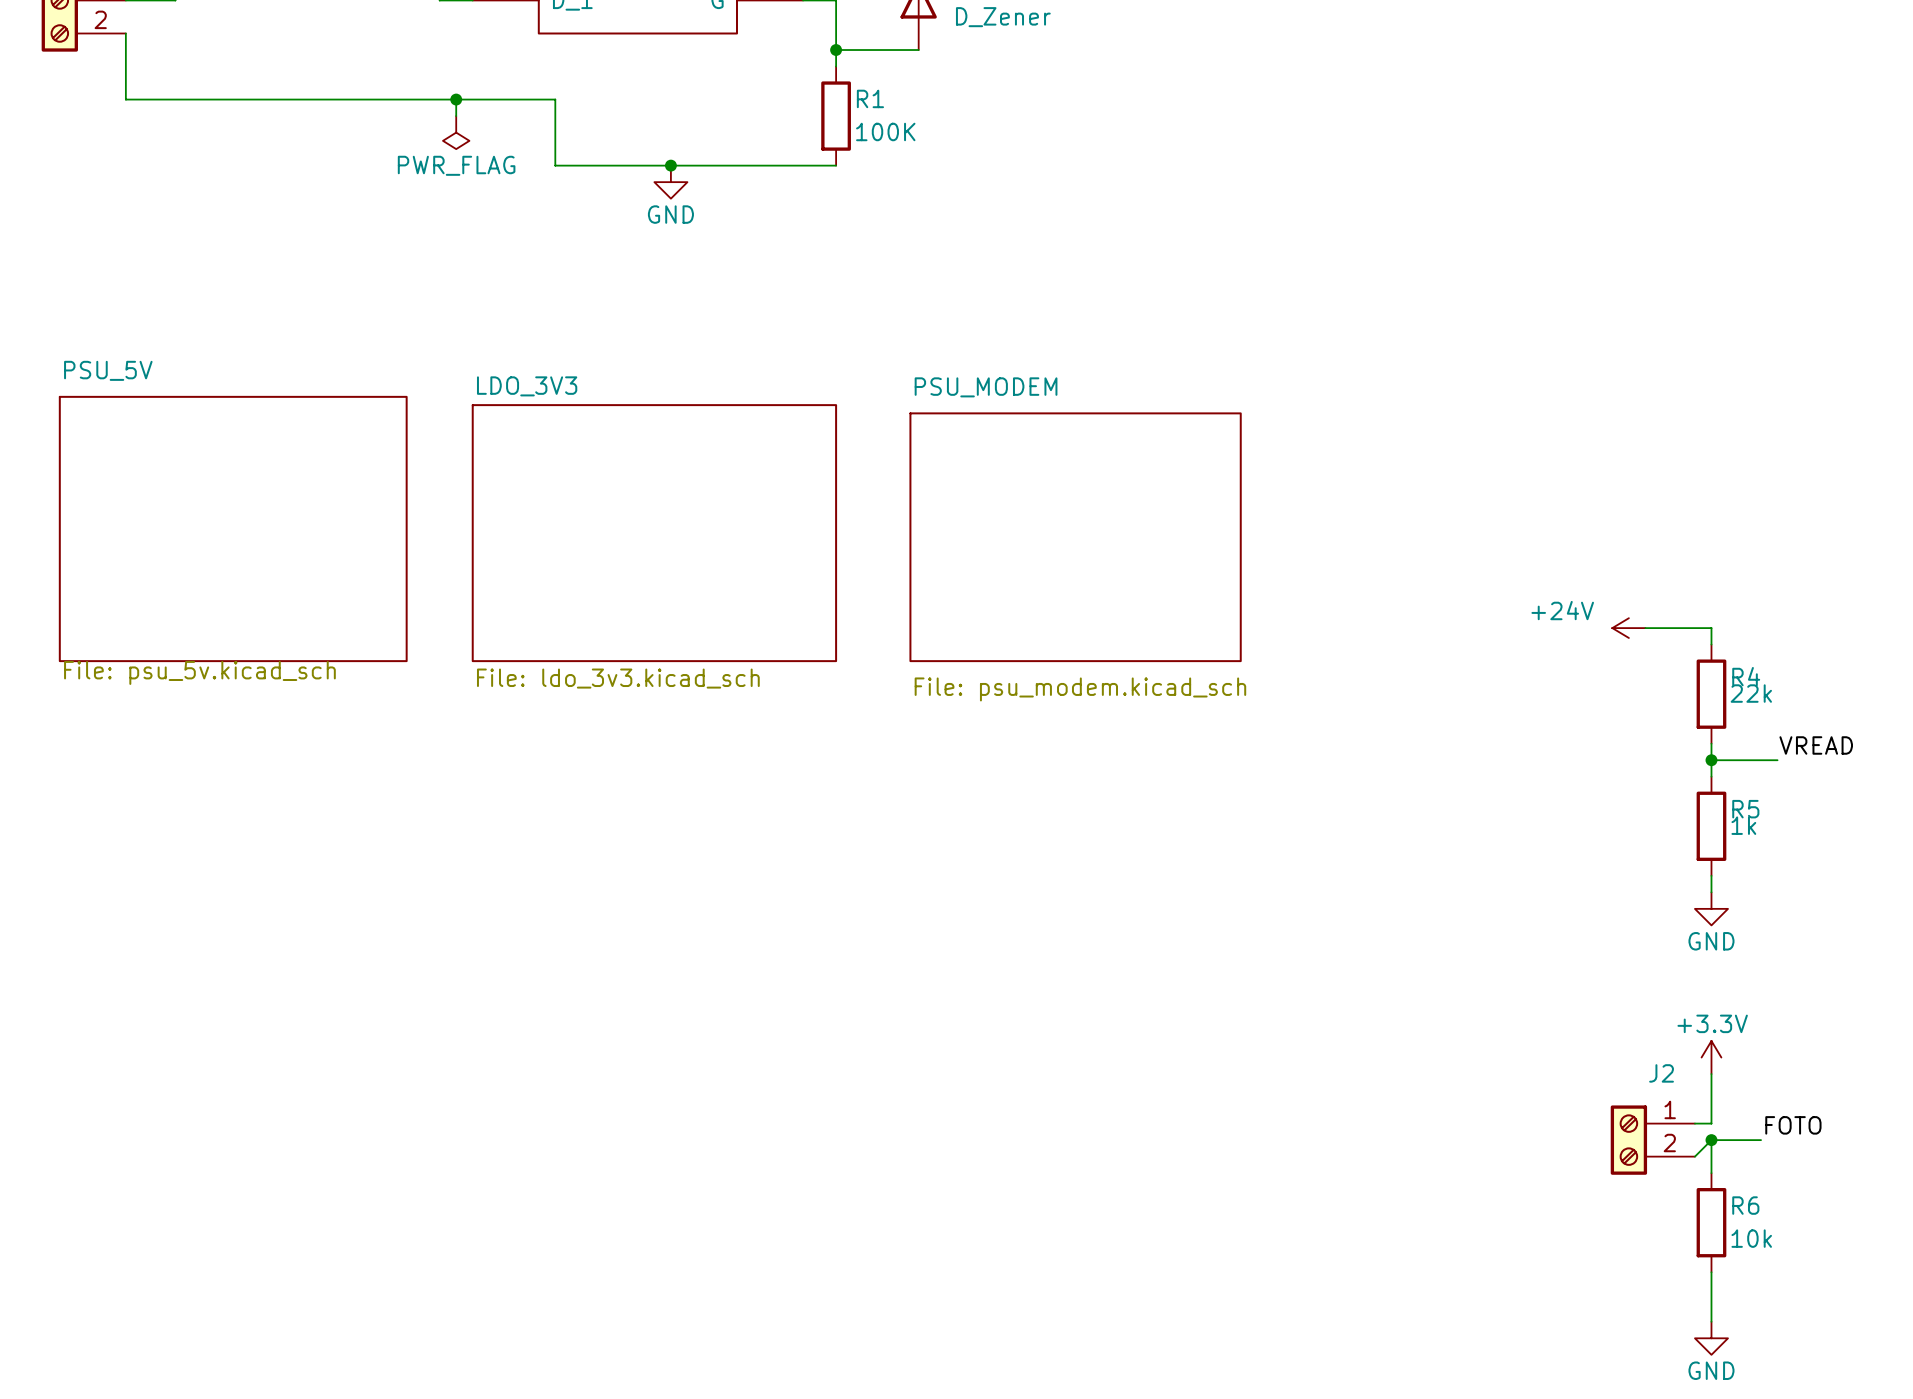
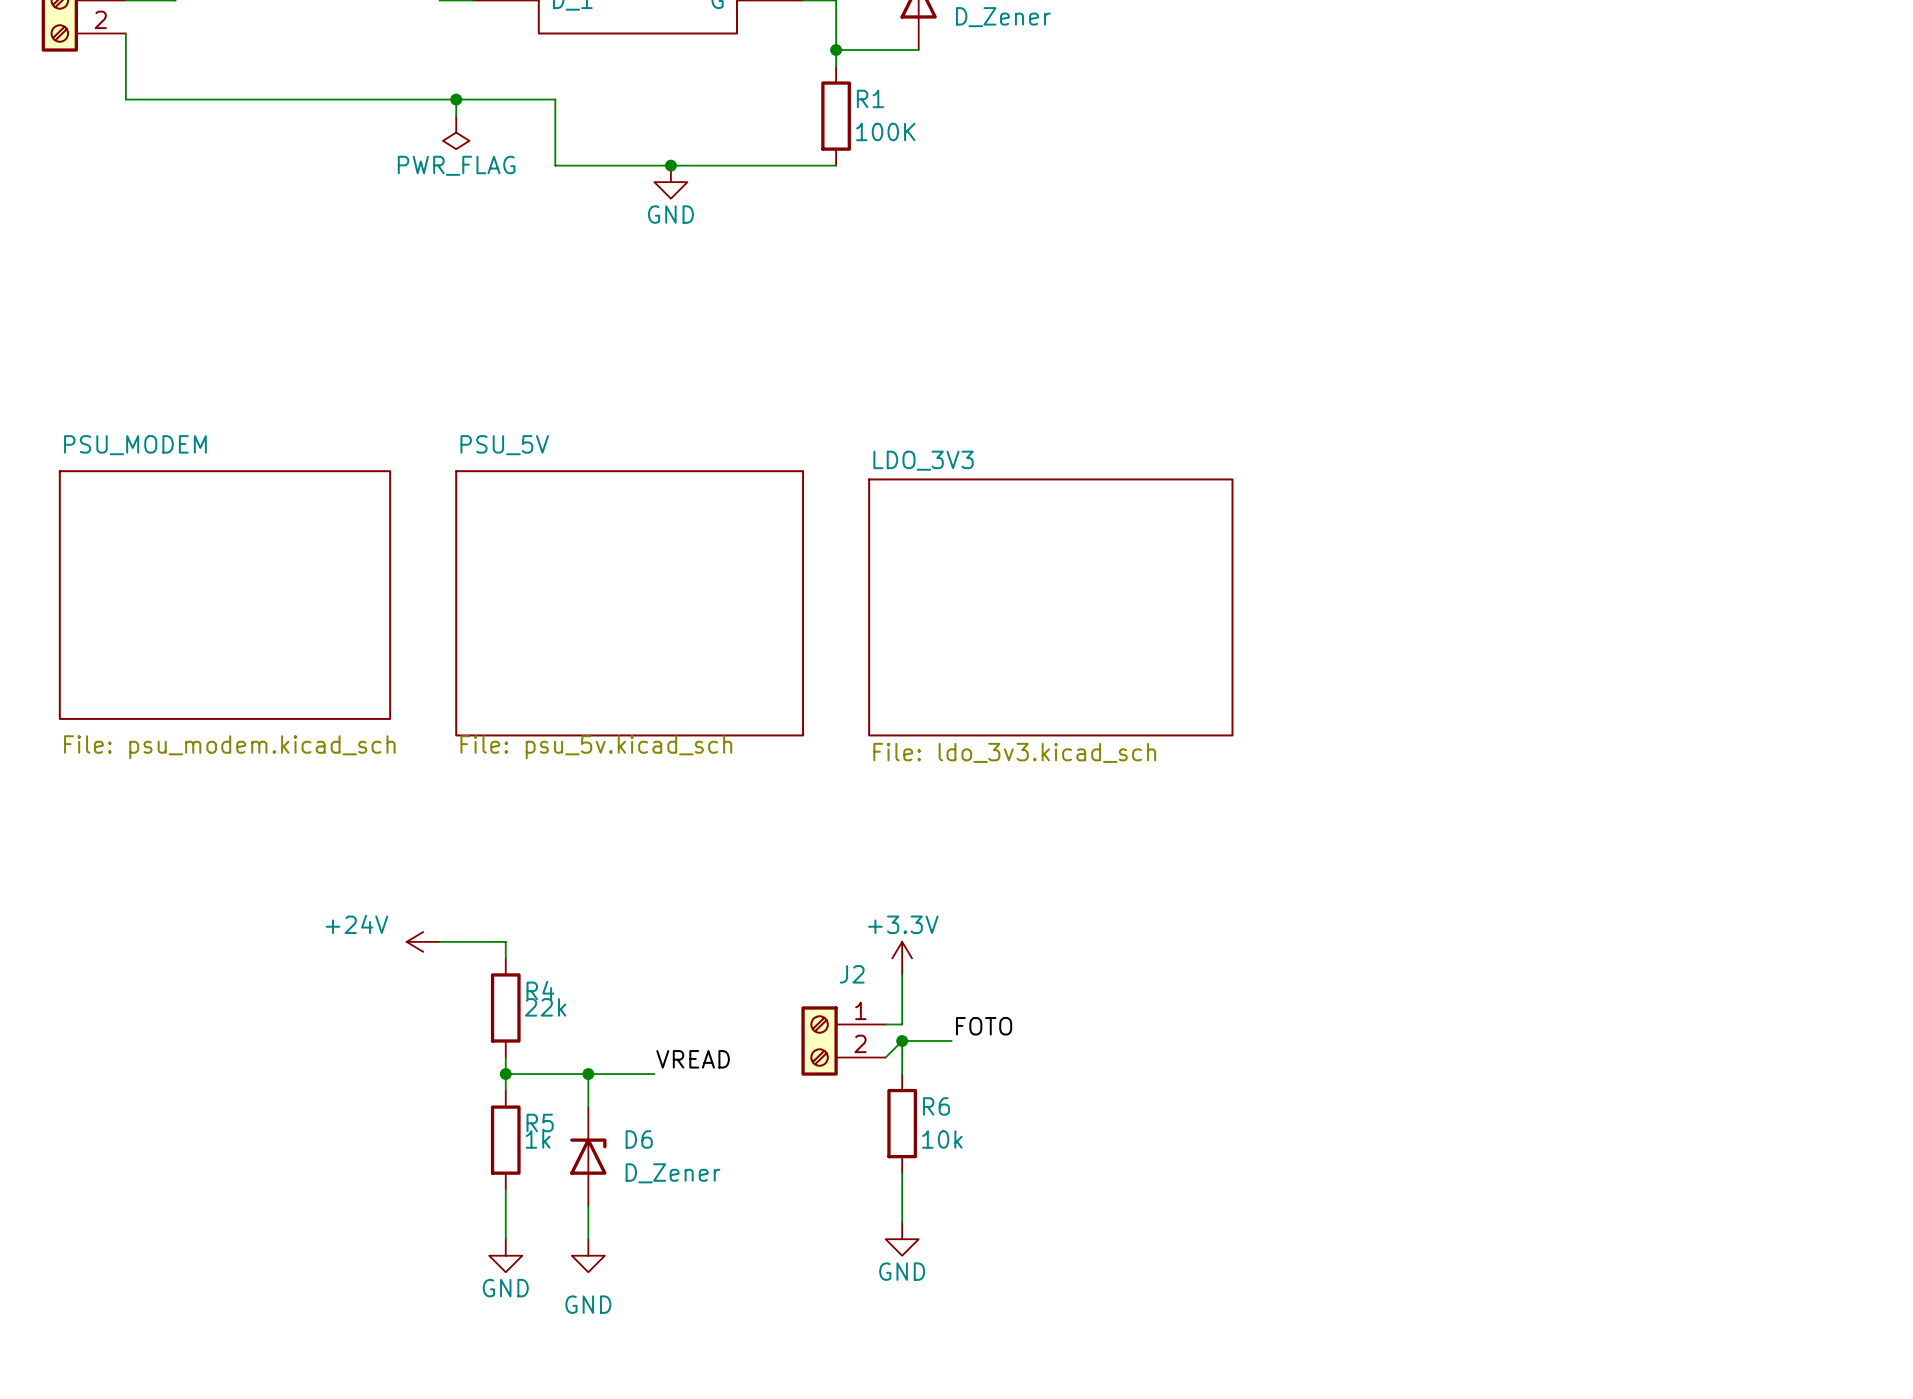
sheet PSU_5V position: (233, 528) -> (629, 603)
sheet LDO_3V3 position: (654, 533) -> (1050, 607)
sheet PSU_MODEM: File: psu_modem.kicad_sch (1075, 537) -> none
sheet PSU_MODEM: none -> File: psu_modem.kicad_sch (224, 595)
power symbol: +24V (1628, 628) -> none
wire: (1645, 628) (1711, 628) (1711, 644) -> none
R4 position: (1711, 694) -> (505, 1007)
wire: (1711, 743) (1711, 776) -> none
label: VREAD (1816, 745) -> none
wire: (1711, 760) (1777, 760) -> none
junction: (1711, 760) -> none
R5 position: (1711, 826) -> (505, 1140)
wire: (1711, 875) (1711, 892) -> none
power symbol: GND (1711, 908) -> none
power symbol: none -> +24V (423, 941)
wire: none -> (439, 941) (505, 941) (505, 958)
power symbol: none -> +3.3V (902, 958)
wire: none -> (902, 974) (902, 1024) (885, 1024)
label: none -> FOTO (984, 1026)
wire: none -> (902, 1041) (951, 1041)
wire: none -> (902, 1041) (902, 1074)
wire: none -> (902, 1041) (885, 1057)
junction: none -> (902, 1041)
wire: none -> (505, 1057) (505, 1090)
power symbol: +3.3V (1711, 1057) -> none
label: none -> VREAD (693, 1059)
wire: none -> (505, 1074) (654, 1074)
junction: none -> (505, 1074)
wire: none -> (588, 1074) (588, 1107)
junction: none -> (588, 1074)
wire: (1711, 1074) (1711, 1123) (1694, 1123) -> none
label: FOTO (1793, 1125) -> none
J2 position: (1652, 1140) -> (843, 1041)
wire: (1711, 1140) (1711, 1173) -> none
wire: (1711, 1140) (1761, 1140) -> none
wire: (1711, 1140) (1694, 1156) -> none
junction: (1711, 1140) -> none
D6: none -> D_Zener (588, 1156)
wire: none -> (902, 1173) (902, 1222)
wire: none -> (505, 1189) (505, 1239)
wire: none -> (588, 1206) (588, 1239)
R6 position: (1711, 1222) -> (902, 1123)
power symbol: none -> GND (902, 1239)
power symbol: none -> GND (505, 1255)
power symbol: none -> GND (588, 1255)
wire: (1711, 1272) (1711, 1321) -> none
power symbol: GND (1711, 1338) -> none

